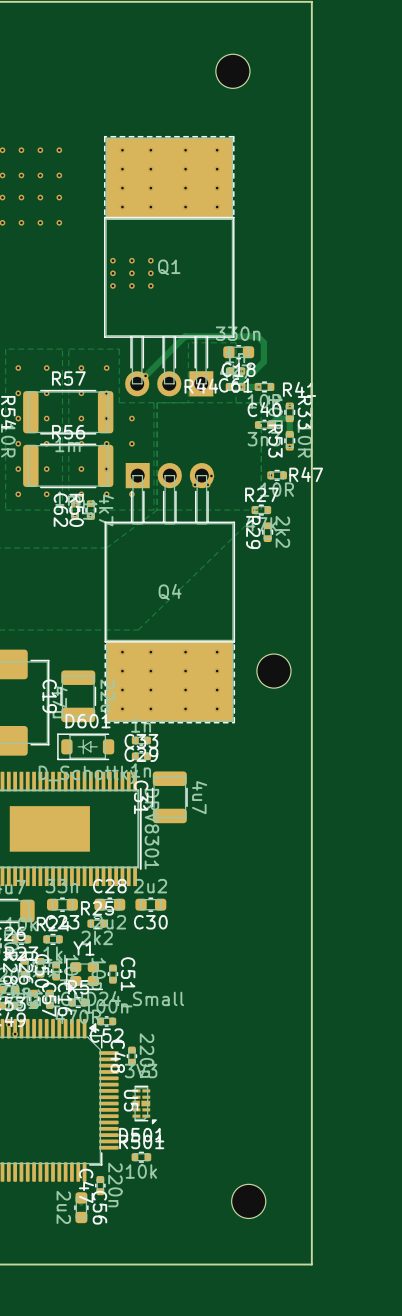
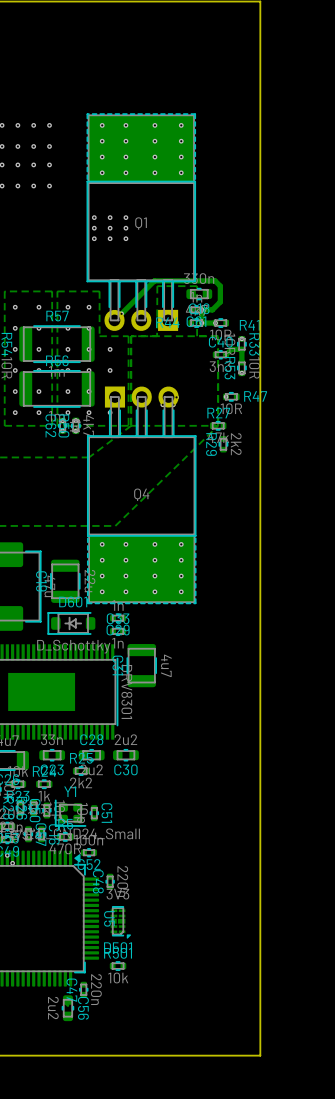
part: (232, 71) -> none
part: (273, 671) -> none
part: (248, 1201) -> none

